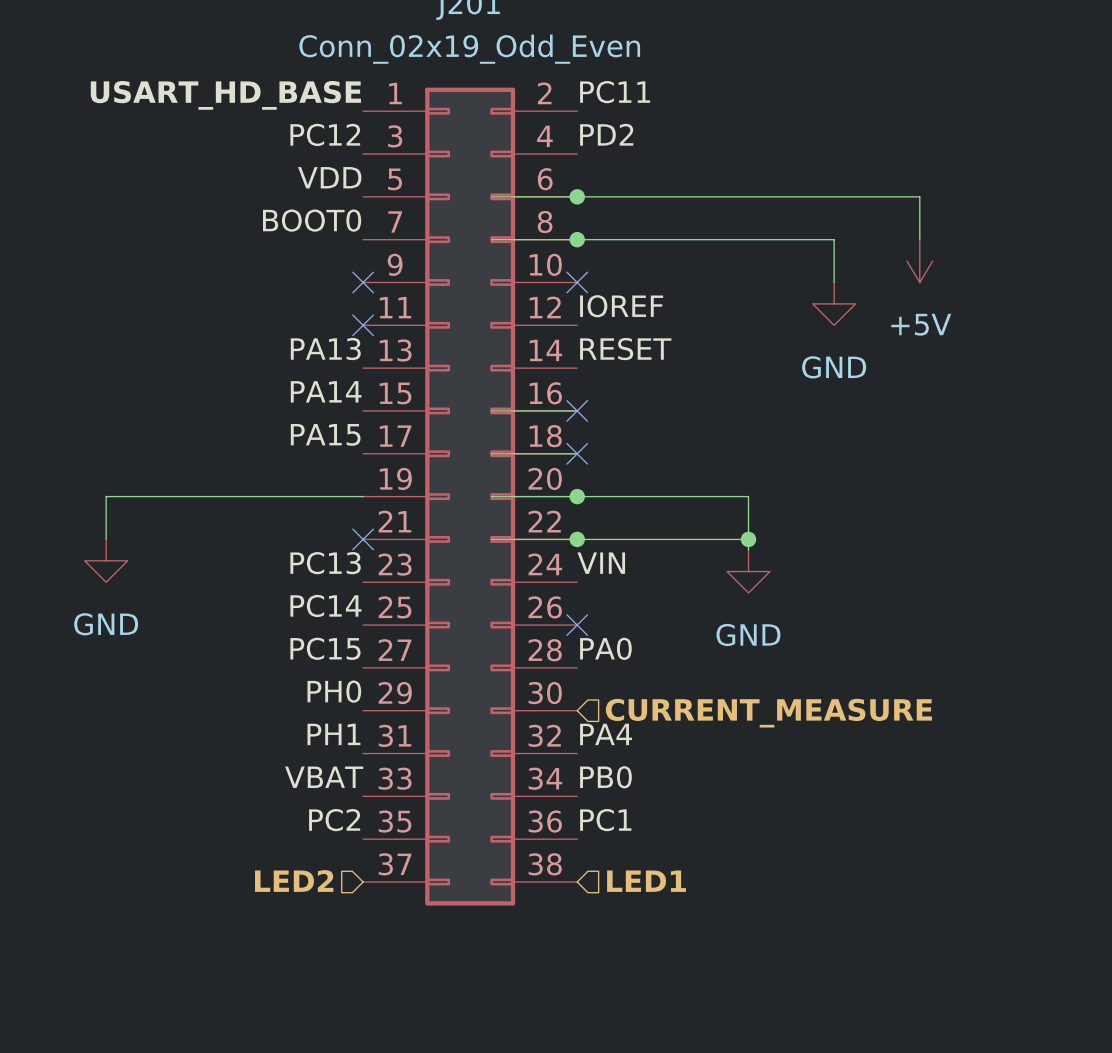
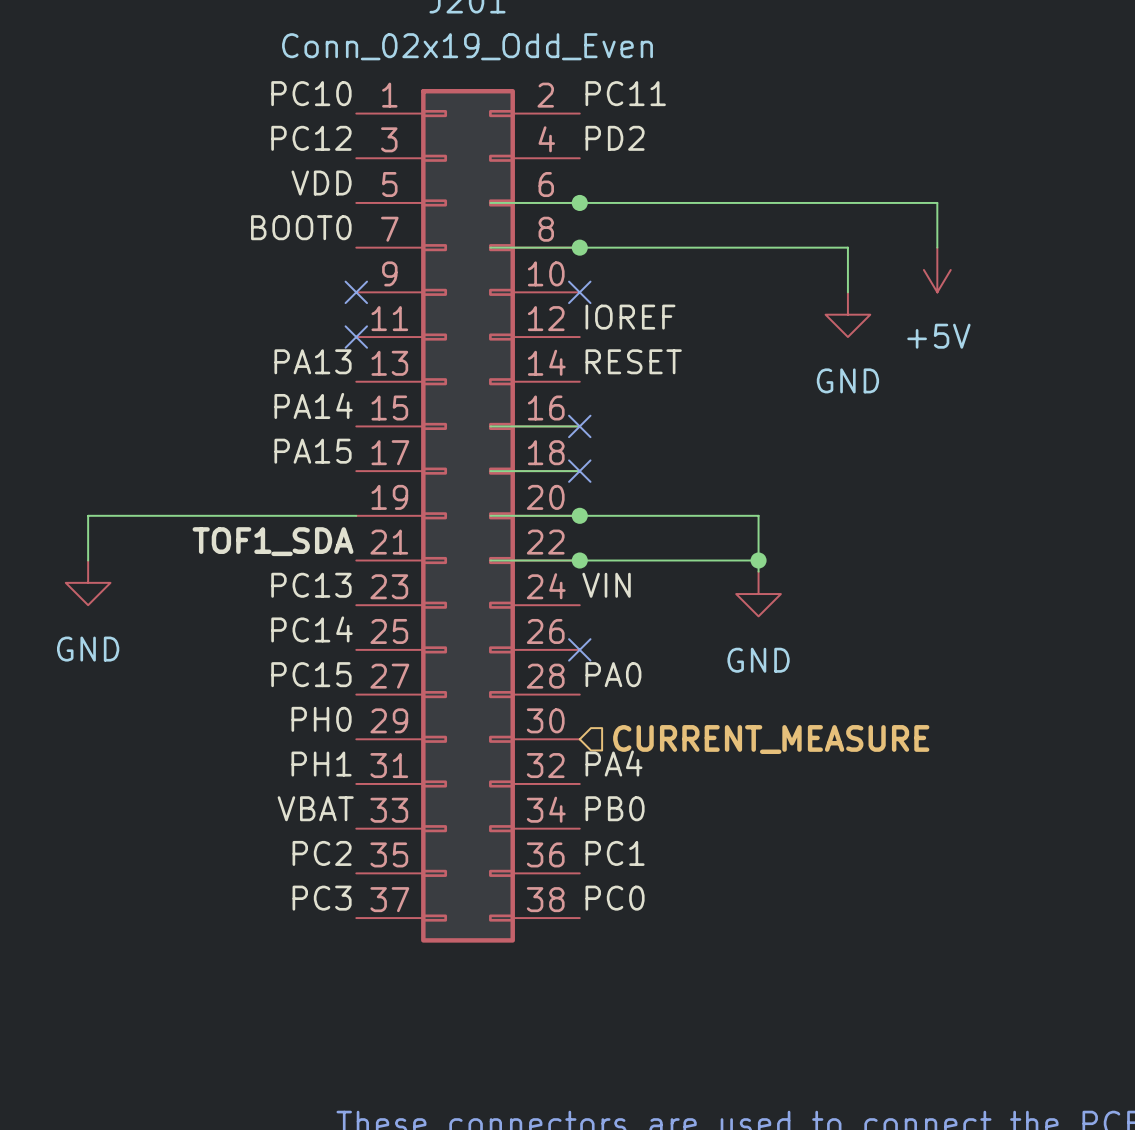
label: USART_HD_BASE (225, 95) -> PC10 (311, 93)
label: none -> TOF1_SDA (273, 541)
no-connect mark: (363, 539) -> none
label: none -> PC3 (322, 898)
label: none -> PC0 (615, 898)
hierarchical label: LED2 (294, 881) -> none
hierarchical label: LED1 (646, 881) -> none

